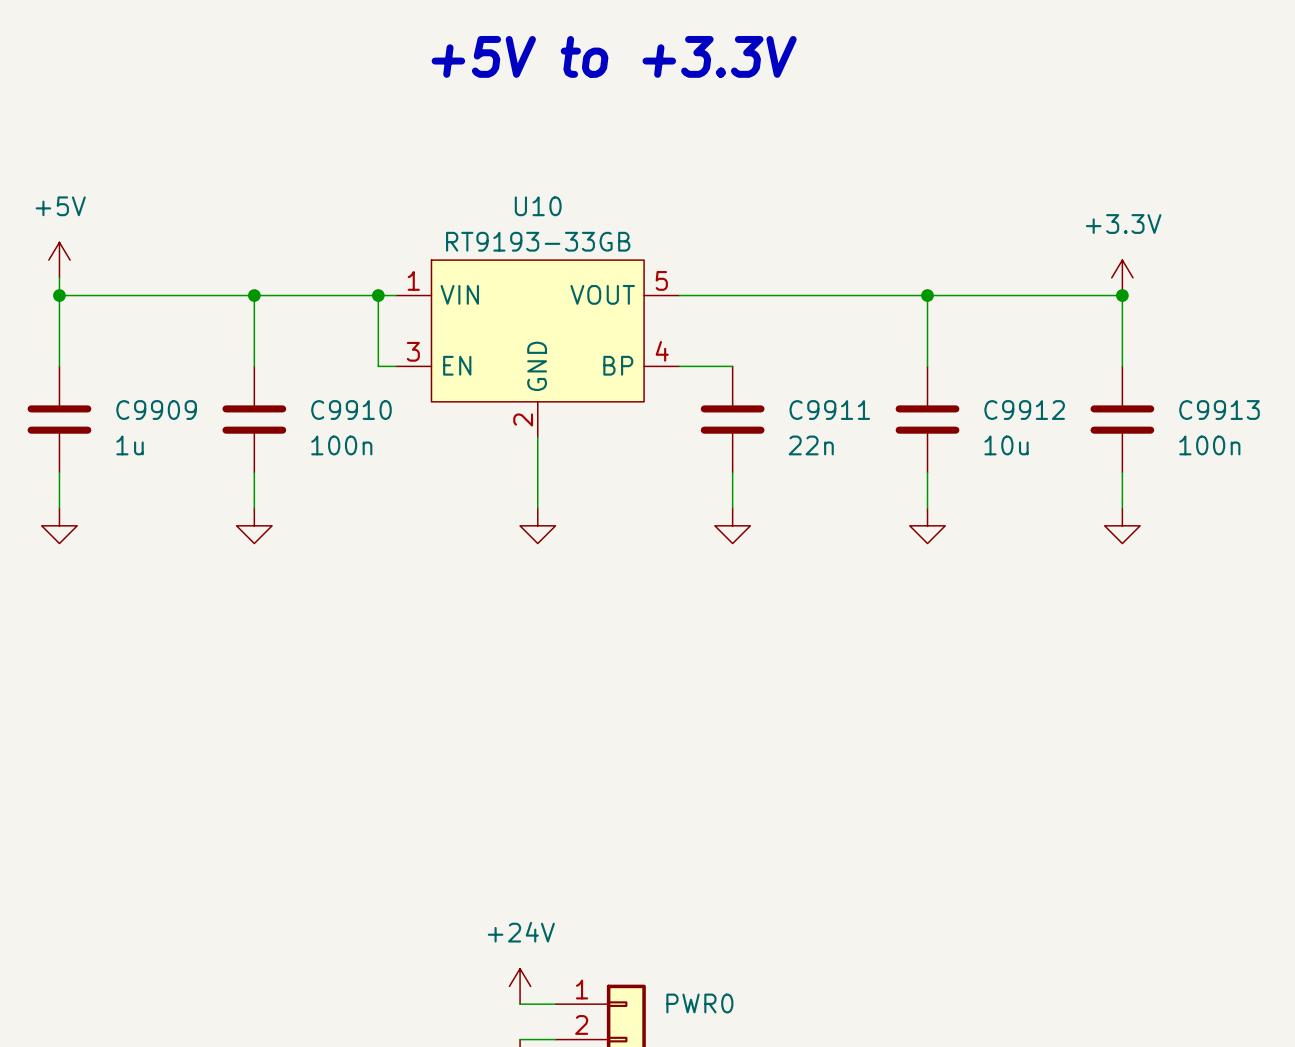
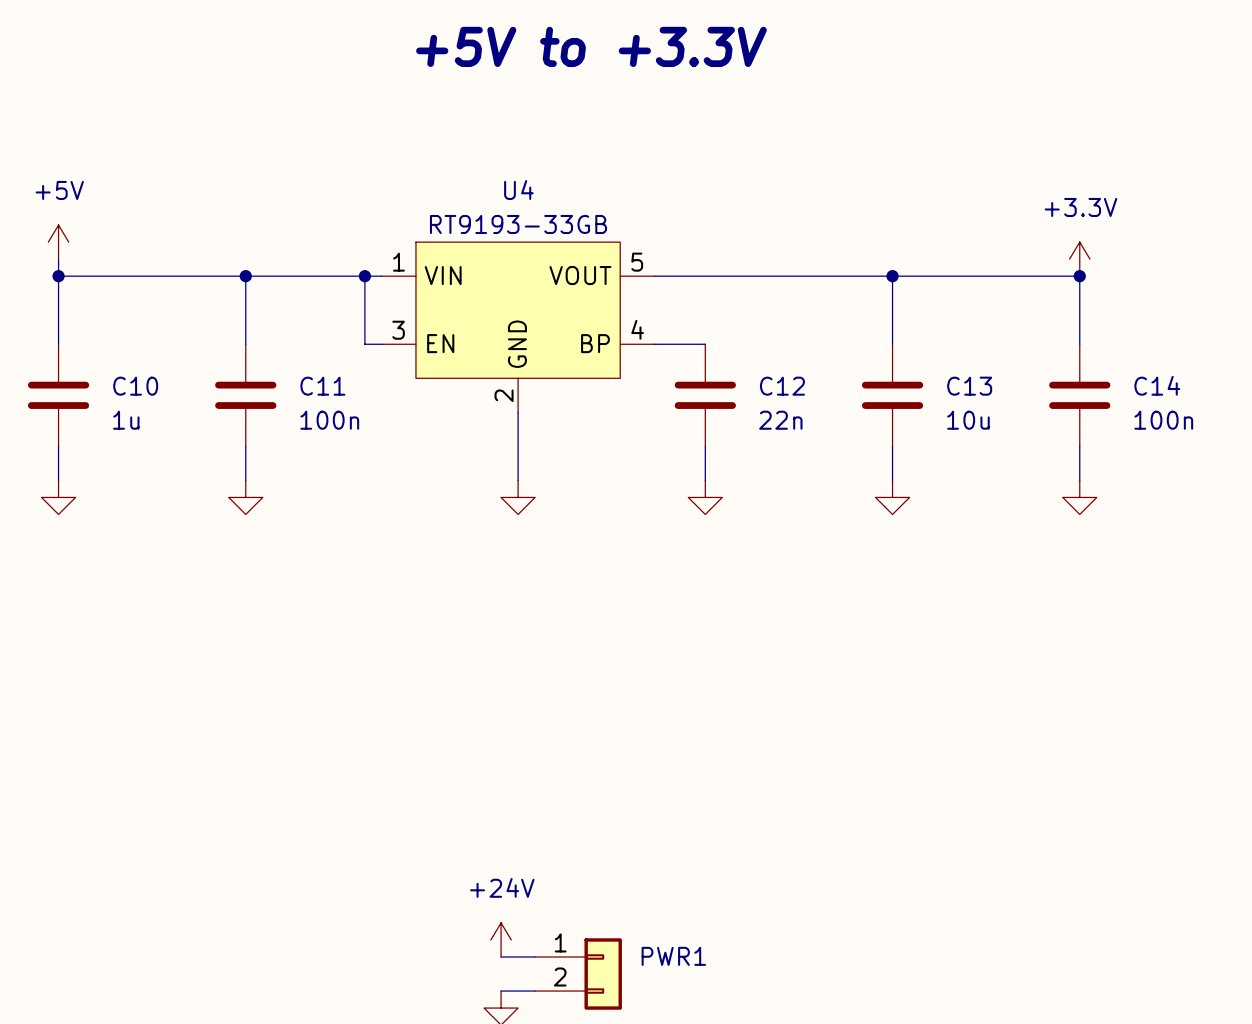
U10 name: U10 (538, 206) -> U4 (518, 190)
C9909 name: C9909 (156, 410) -> C10 (135, 386)
C9910 name: C9910 (351, 410) -> C11 (322, 386)
C9911 name: C9911 (829, 410) -> C12 (782, 386)
C9912 name: C9912 (1024, 410) -> C13 (969, 386)
C9913 name: C9913 (1219, 410) -> C14 (1157, 385)
PWR0 name: PWR0 (699, 1003) -> PWR1 (673, 956)

